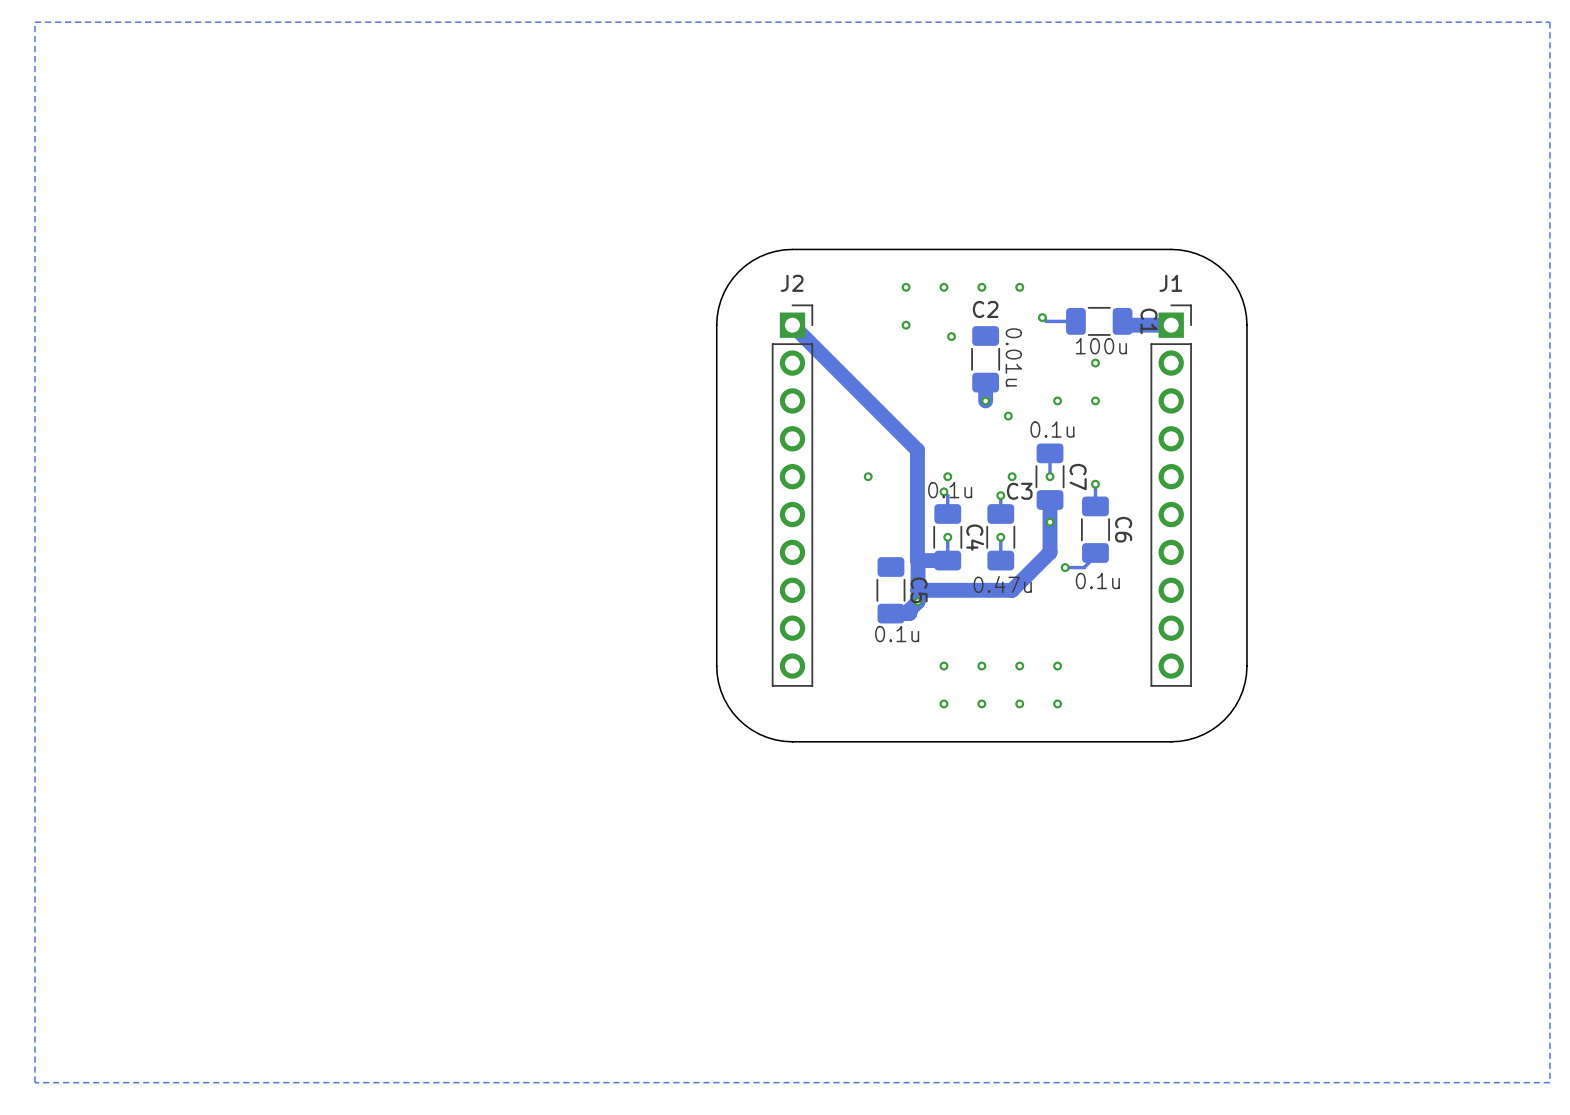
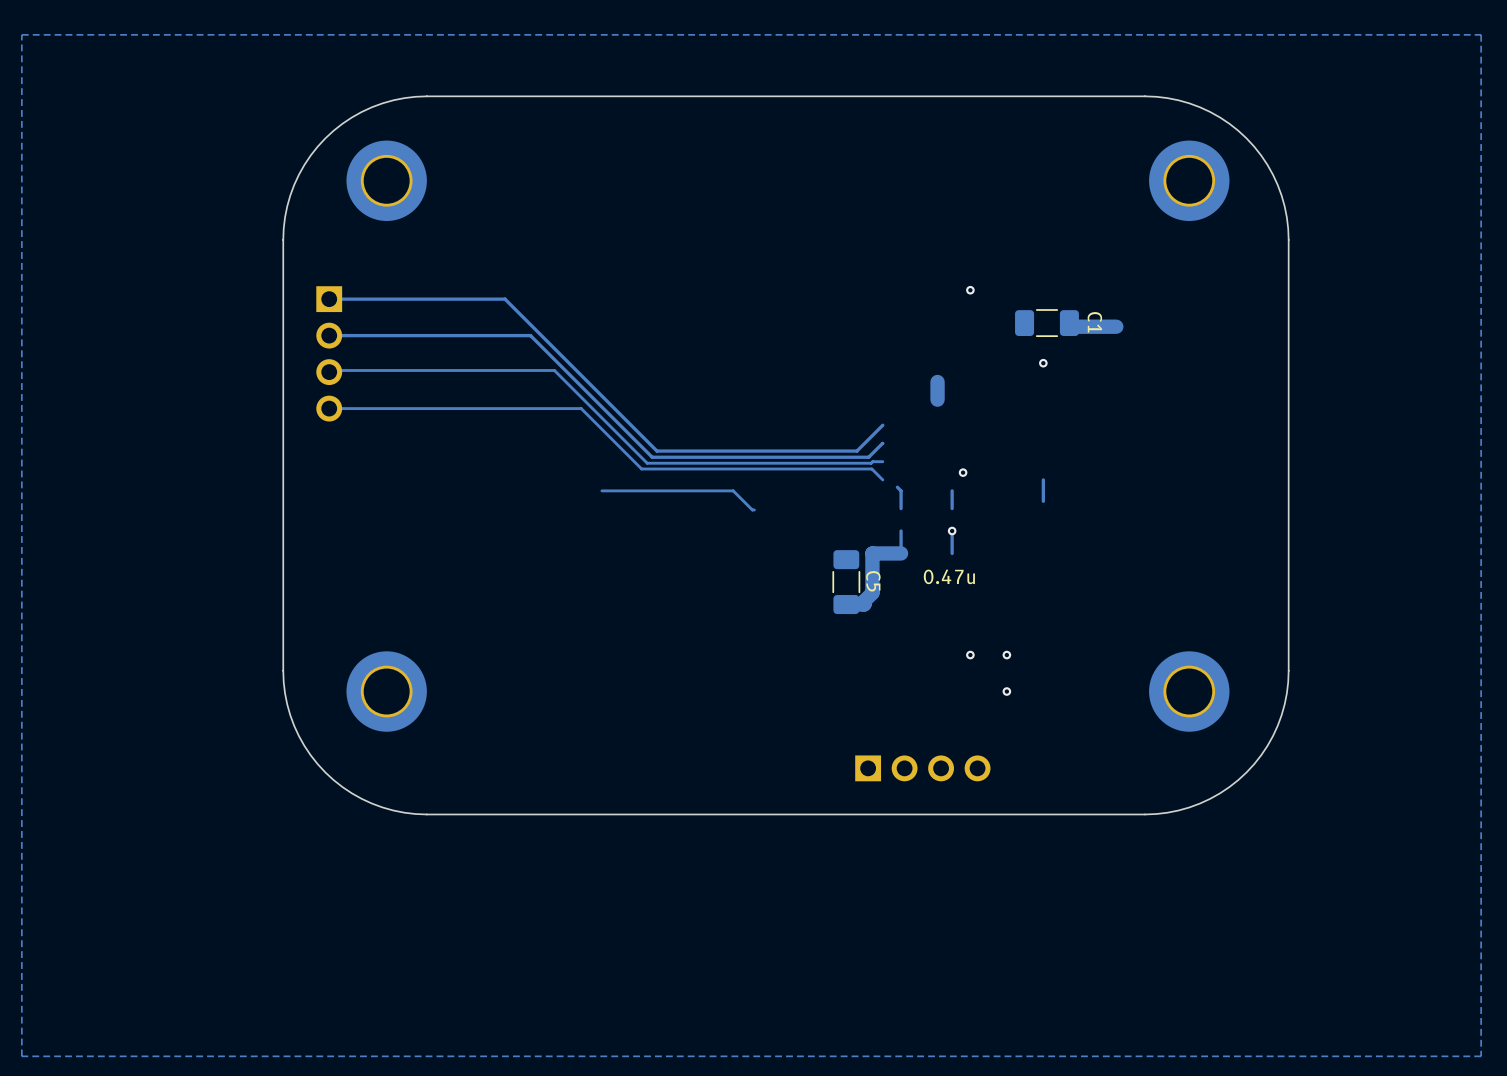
board edge: none -> (1145, 96) (415, 96) (393, 100) (371, 107) (351, 117) (333, 130) (310, 155) (294, 185) (285, 217) (283, 239) (283, 682) (287, 704) (294, 725) (304, 745) (317, 764) (342, 787) (361, 798) (393, 810) (426, 814) (1156, 814) (1178, 810) (1199, 803) (1220, 793) (1238, 780) (1254, 764) (1273, 736) (1284, 704) (1288, 682) (1288, 239) (1286, 217) (1281, 195) (1267, 164) (1254, 146) (1238, 130) (1210, 111) (1189, 103) (1167, 98) (1145, 96)
part: none -> (386, 180)
part: none -> (1189, 180)
board edge: (1171, 249) (792, 249) (775, 251) (759, 256) (738, 271) (724, 292) (718, 308) (716, 325) (717, 674) (724, 698) (738, 719) (759, 734) (775, 739) (792, 741) (1171, 741) (1196, 737) (1211, 730) (1224, 719) (1239, 698) (1245, 682) (1246, 666) (1246, 316) (1242, 300) (1235, 284) (1218, 265) (1196, 253) (1171, 249) -> none
via: (906, 287) -> none
via: (943, 287) -> none
via: (981, 287) -> none
track: none -> (329, 299) (505, 299) (656, 451) (856, 451) (882, 425)
track: (1042, 317) (1046, 321) (1075, 321) -> none
via: (1042, 317) -> none
track: (792, 325) (917, 450) (918, 560) -> none
via: (906, 325) -> none
track: none -> (329, 335) (530, 335) (652, 457) (868, 457) (882, 443)
via: (951, 336) -> none
text: 100u (1101, 346) -> none
part: none -> (329, 353)
text: 0.01u (1013, 357) -> none
C2: (985, 359) -> none
track: none -> (329, 372) (330, 370) (554, 370) (647, 463) (882, 461)
via: (985, 400) -> none
via: (1057, 400) -> none
via: (1095, 400) -> none
track: none -> (329, 408) (581, 408) (641, 468) (871, 468) (882, 479)
via: (1008, 416) -> none
text: 0.1u (1052, 429) -> none
track: (1050, 453) (1050, 476) -> none
via: (868, 476) -> none
via: (947, 476) -> none
C7: (1050, 476) -> none
via: (1050, 476) -> none
via: (1095, 484) -> none
text: 0.1u (950, 490) -> none
via: (943, 491) -> none
track: none -> (601, 490) (733, 490) (754, 509)
J2: (792, 495) -> none
via: (1000, 495) -> none
J1: (1171, 495) -> none
track: (1050, 522) (1050, 499) (1050, 552) (1012, 590) (918, 590) -> none
via: (1050, 522) -> none
C6: (1095, 529) -> none
C4: (947, 537) -> none
via: (947, 537) -> none
C3: (1000, 537) -> none
track: (1095, 553) (1095, 556) (1084, 567) (1065, 567) -> none
via: (1065, 567) -> none
text: 0.1u (1097, 581) -> none
via: (918, 601) -> none
text: 0.1u (897, 634) -> none
via: (943, 666) -> none
via: (981, 666) -> none
part: none -> (386, 691)
via: (943, 703) -> none
via: (981, 703) -> none
via: (1019, 703) -> none
part: none -> (1189, 691)
part: none -> (922, 768)

